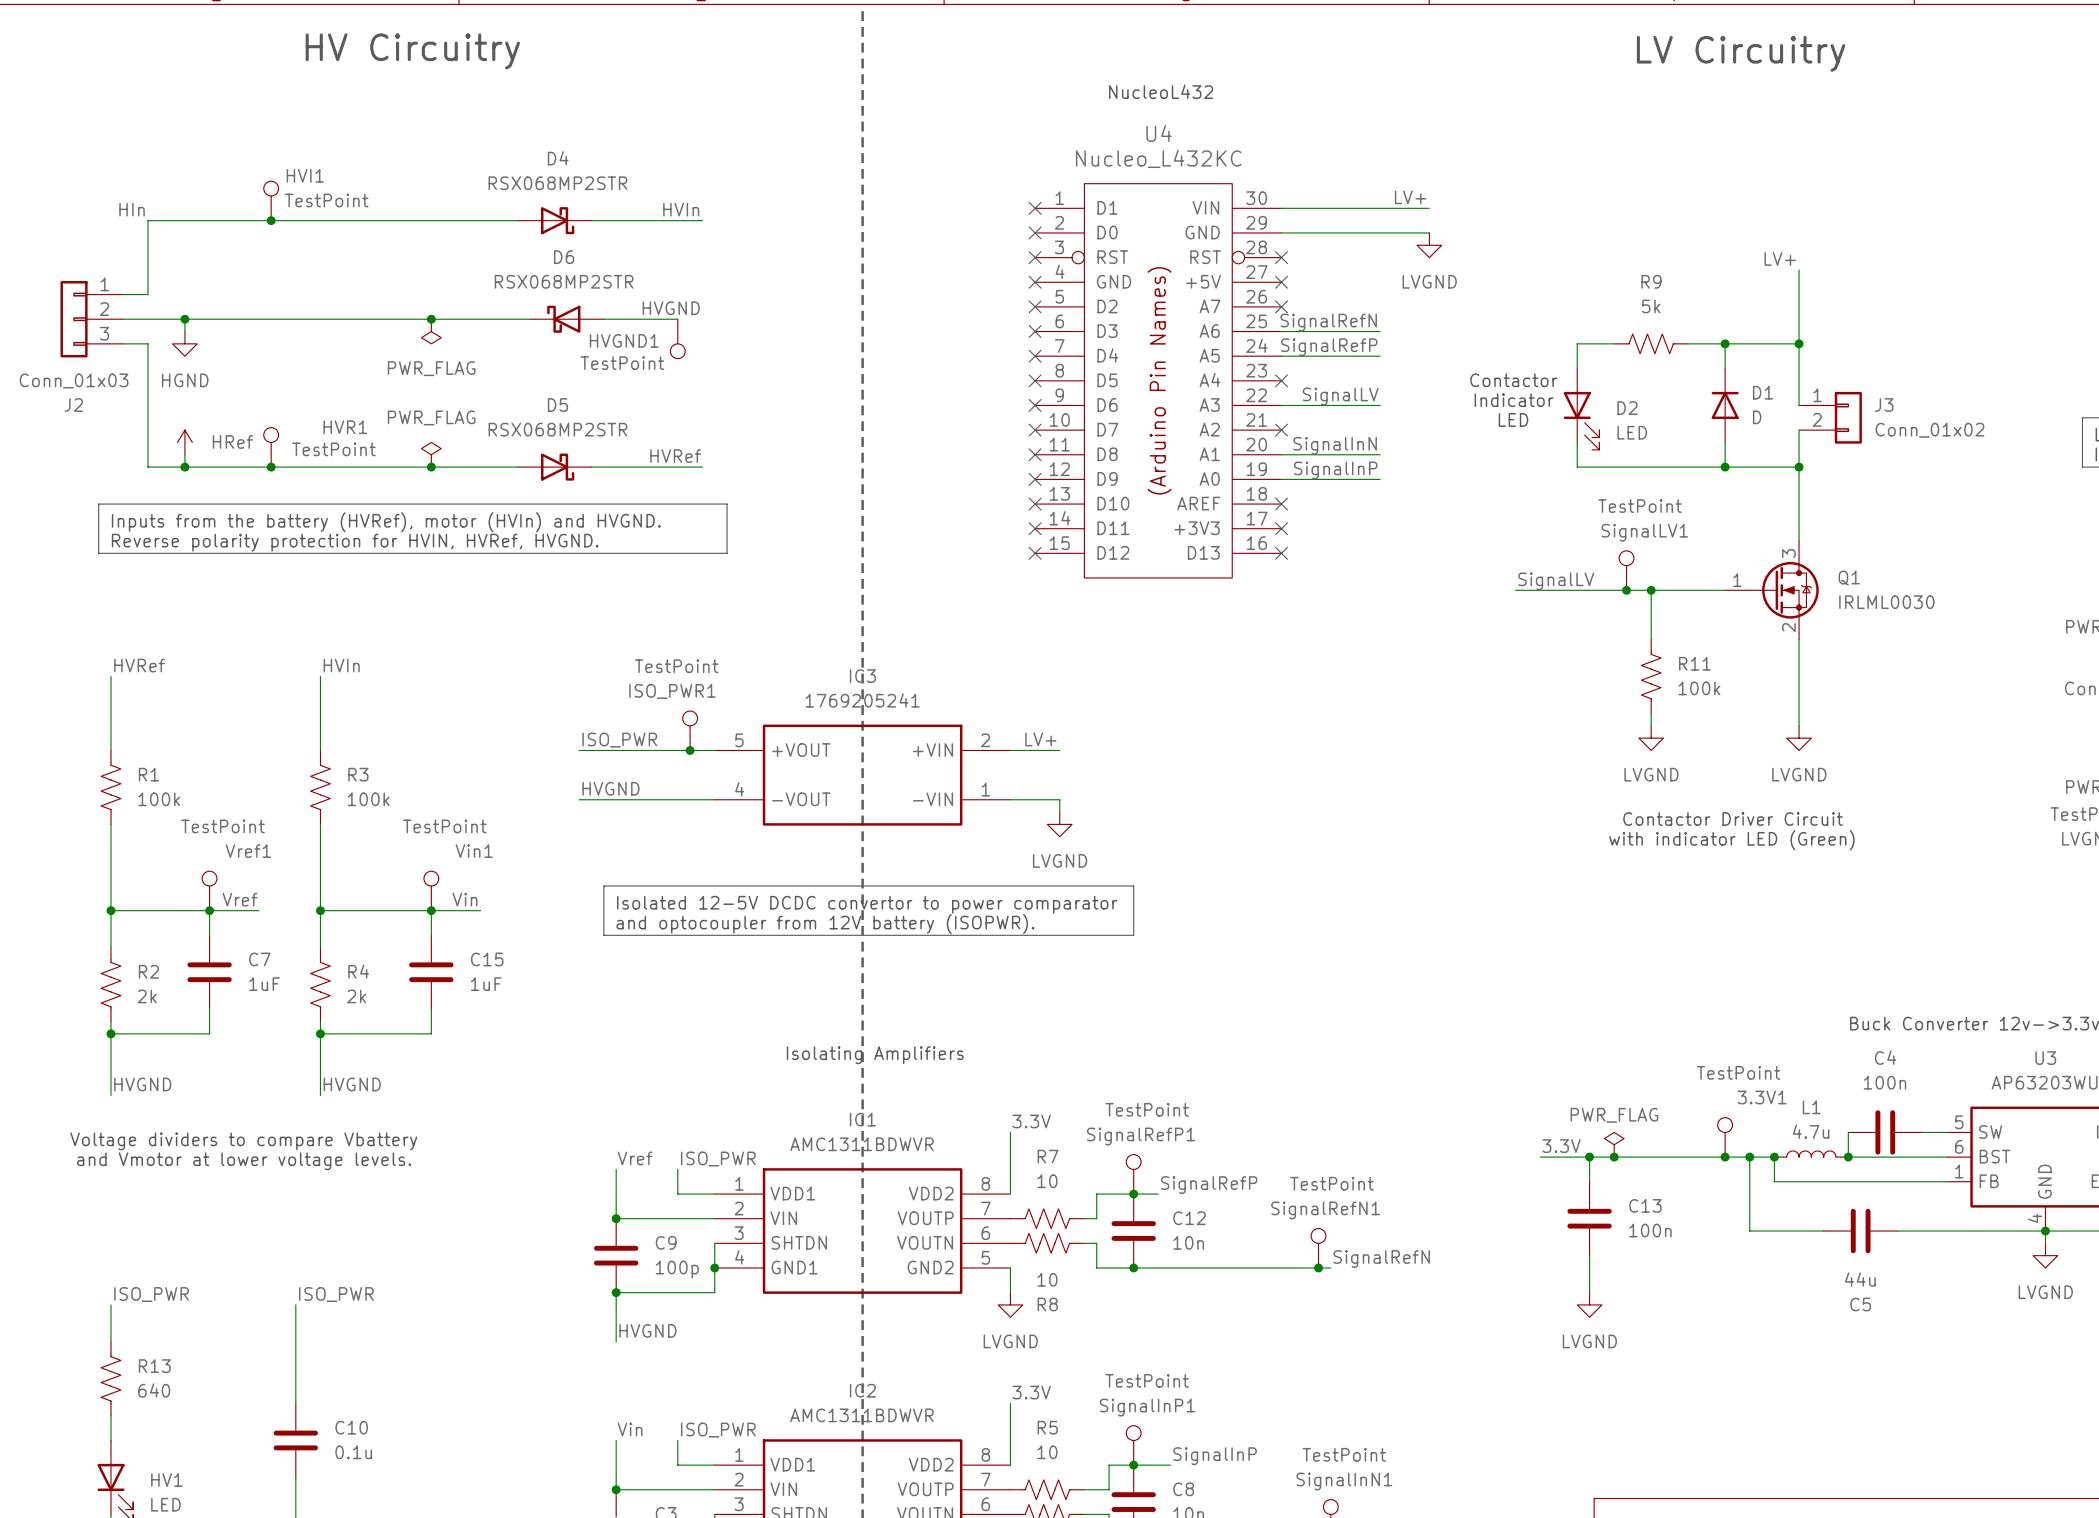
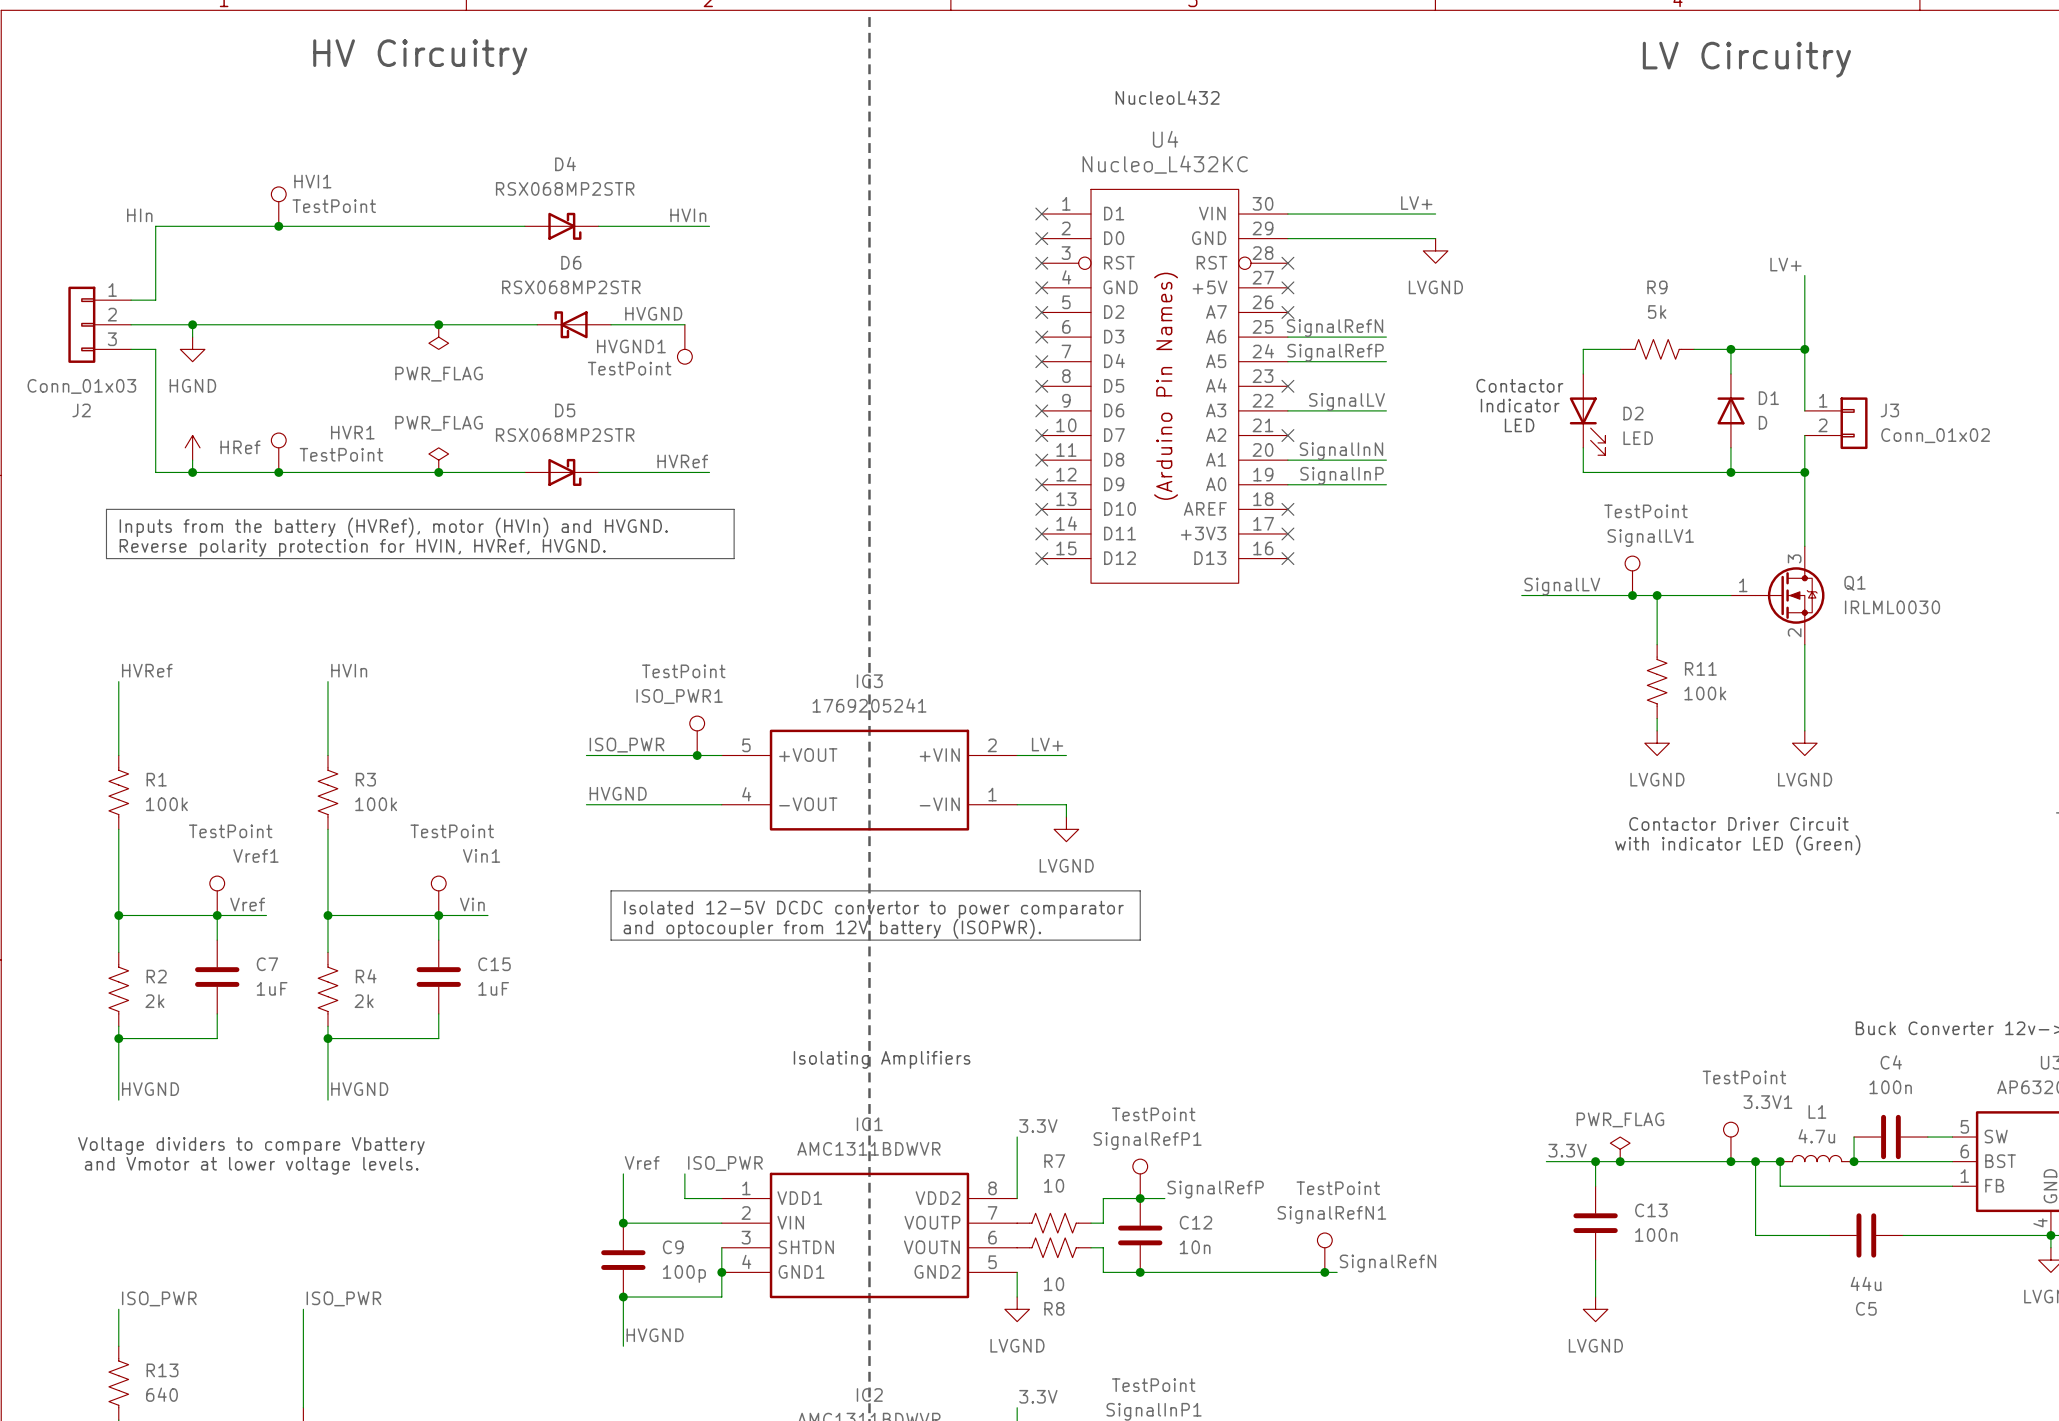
label position: HVGND (671, 308) -> HVGND (653, 313)

